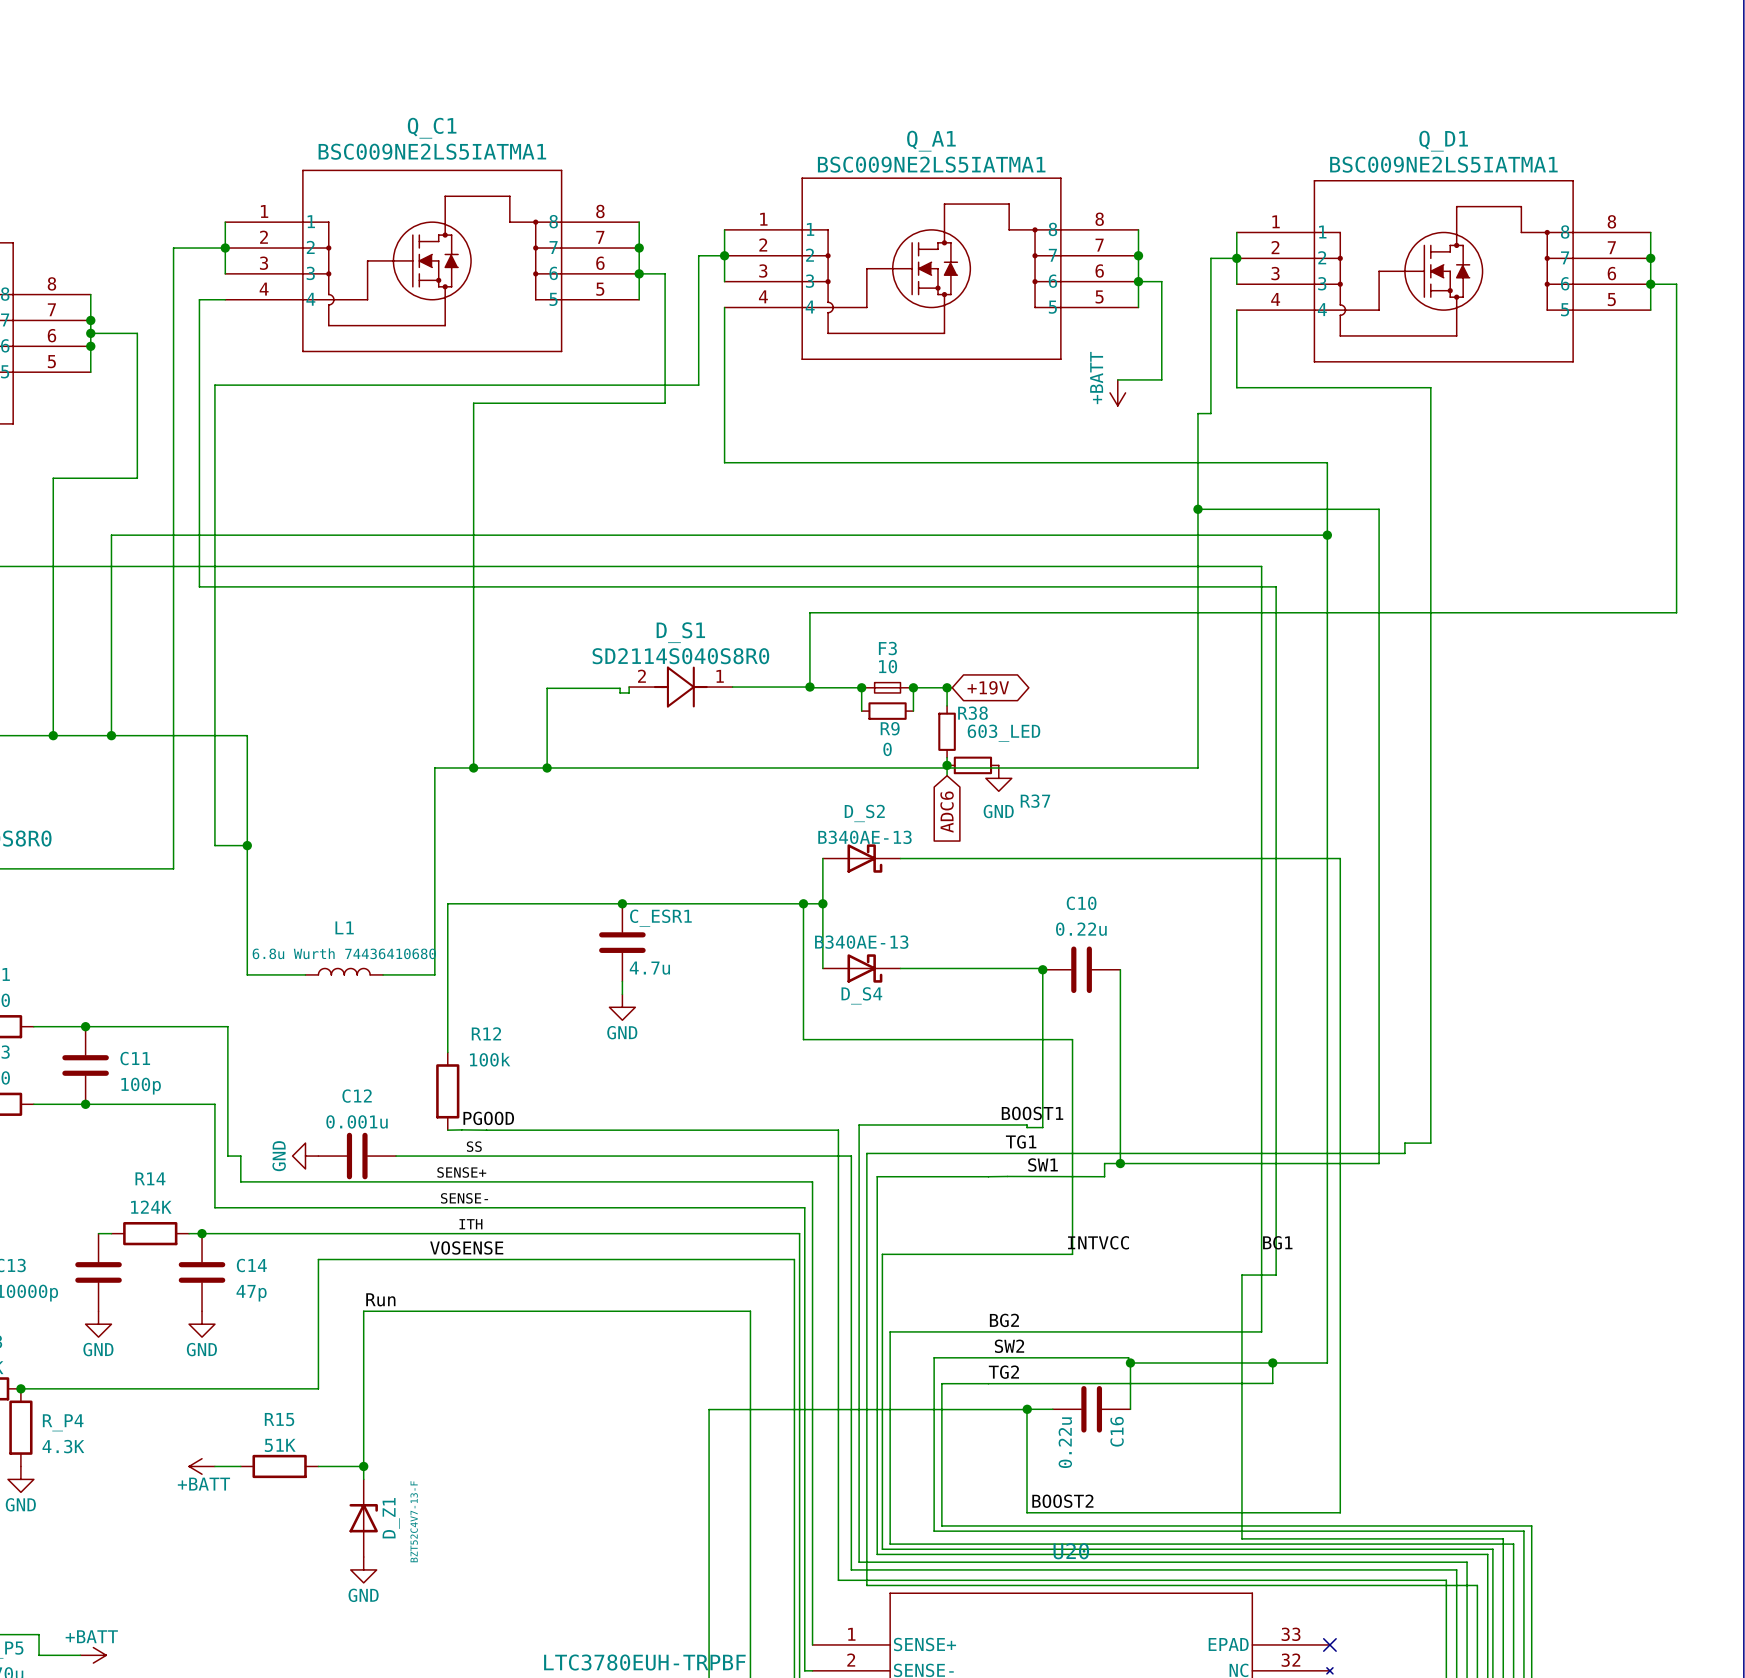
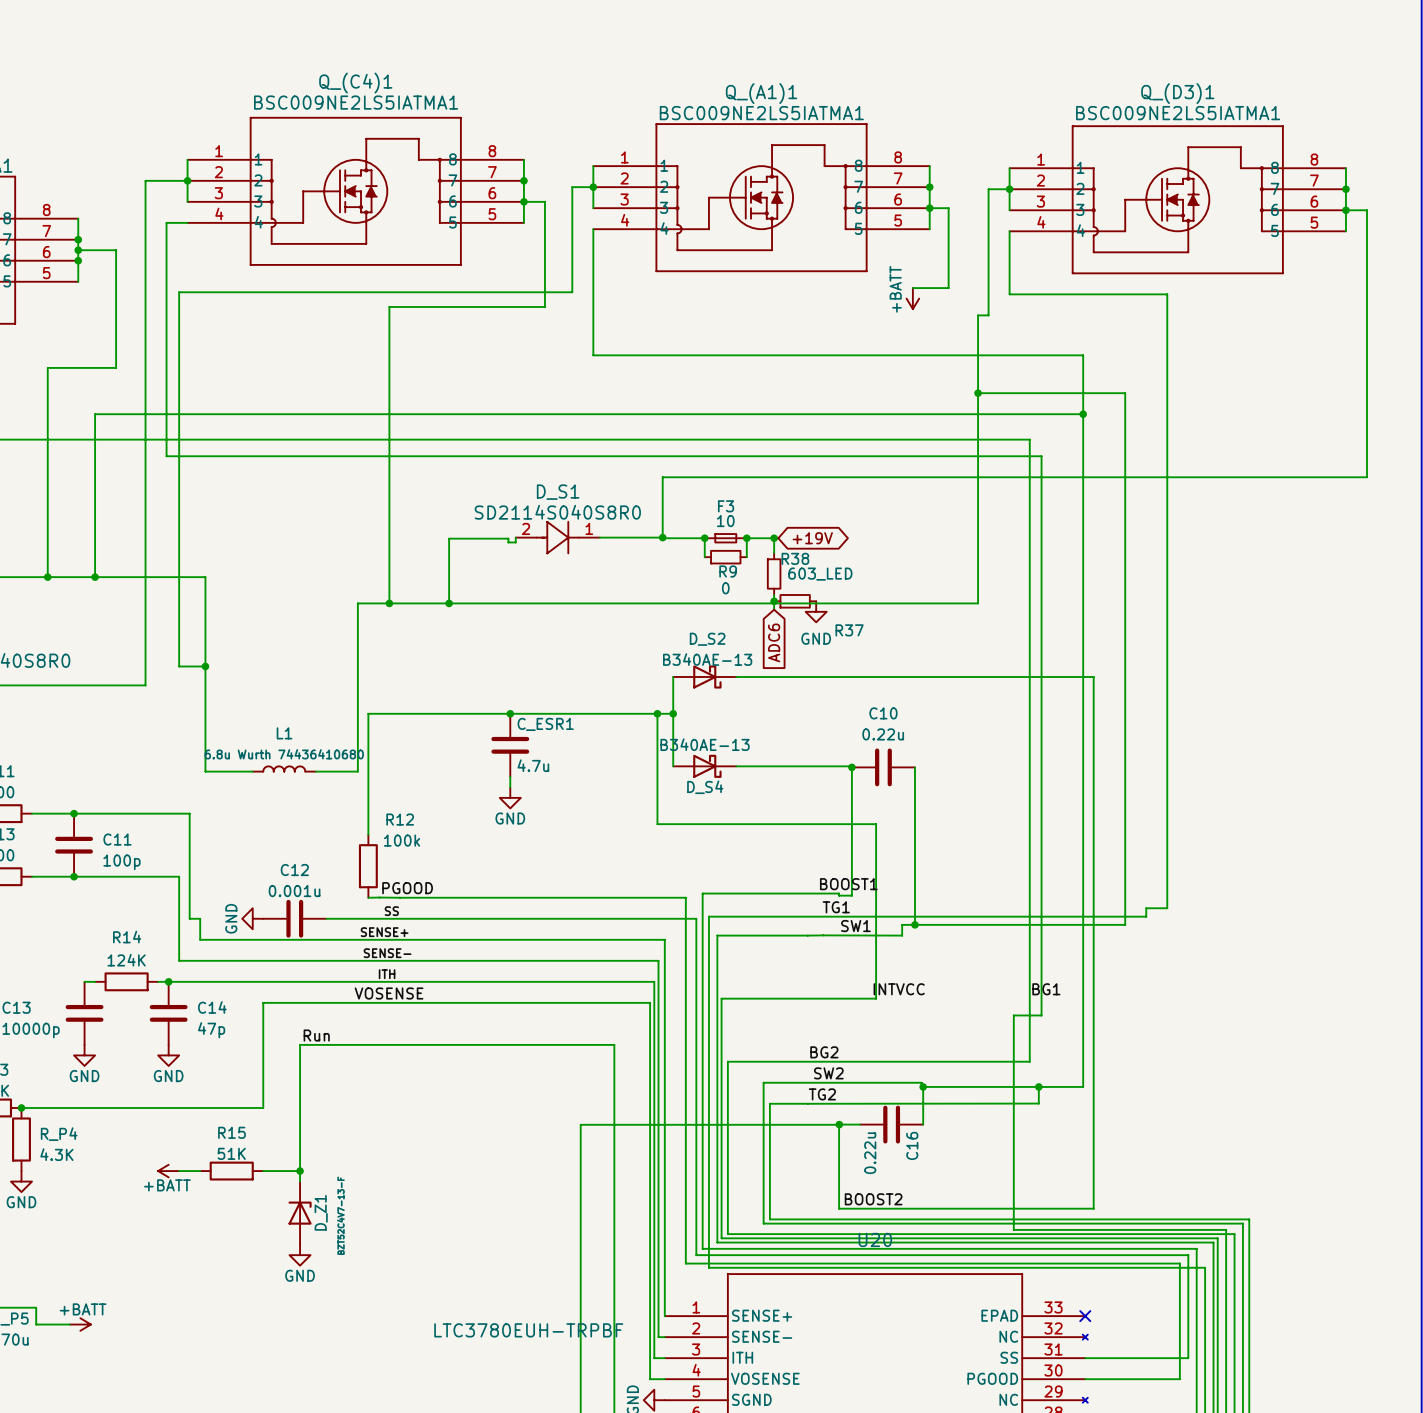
Q_C1 name: Q_C1 (432, 128) -> Q_(C4)1 (355, 83)
Q_A1 name: Q_A1 (931, 141) -> Q_(A1)1 (761, 93)
Q_D1 name: Q_D1 (1443, 141) -> Q_(D3)1 (1177, 93)

